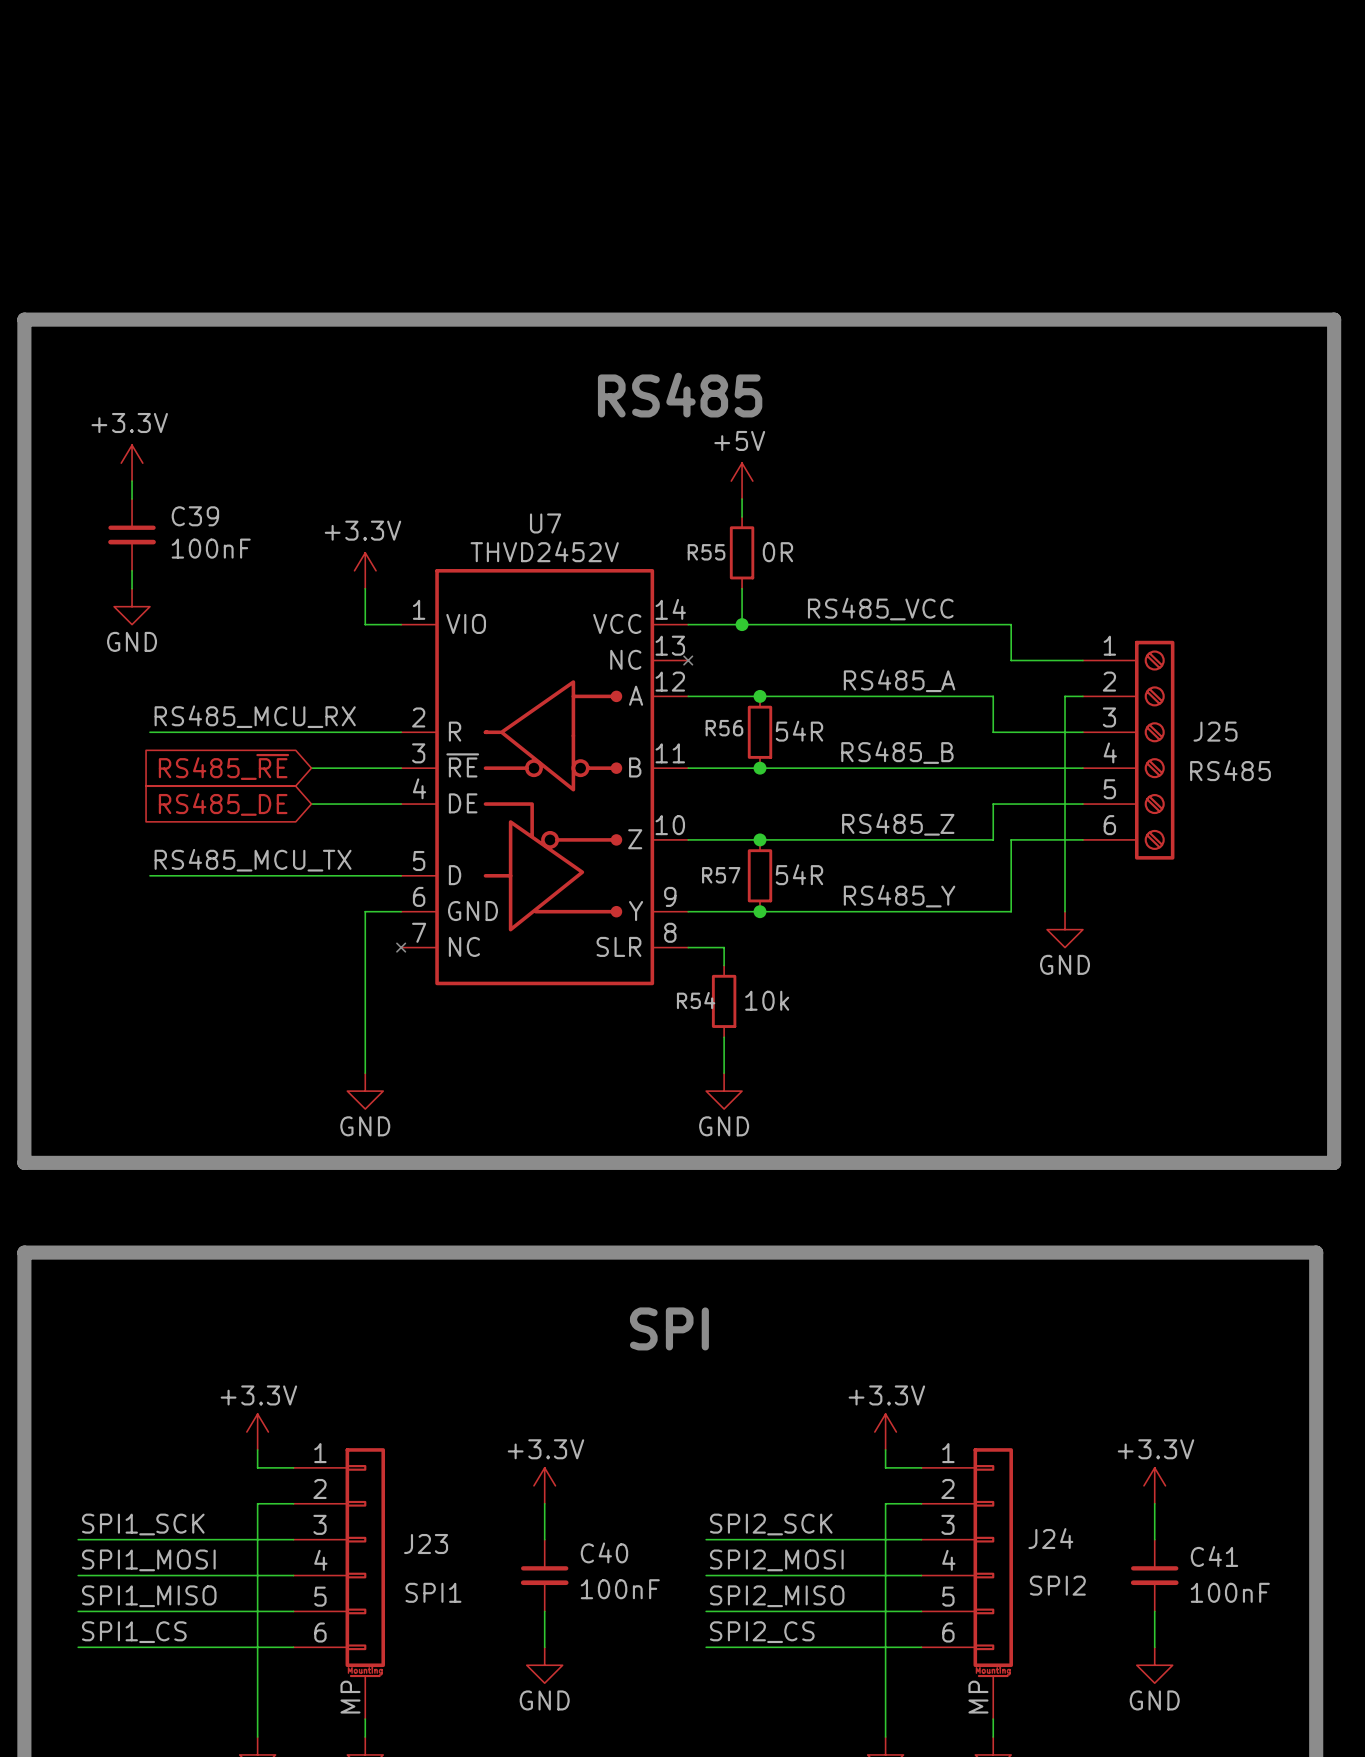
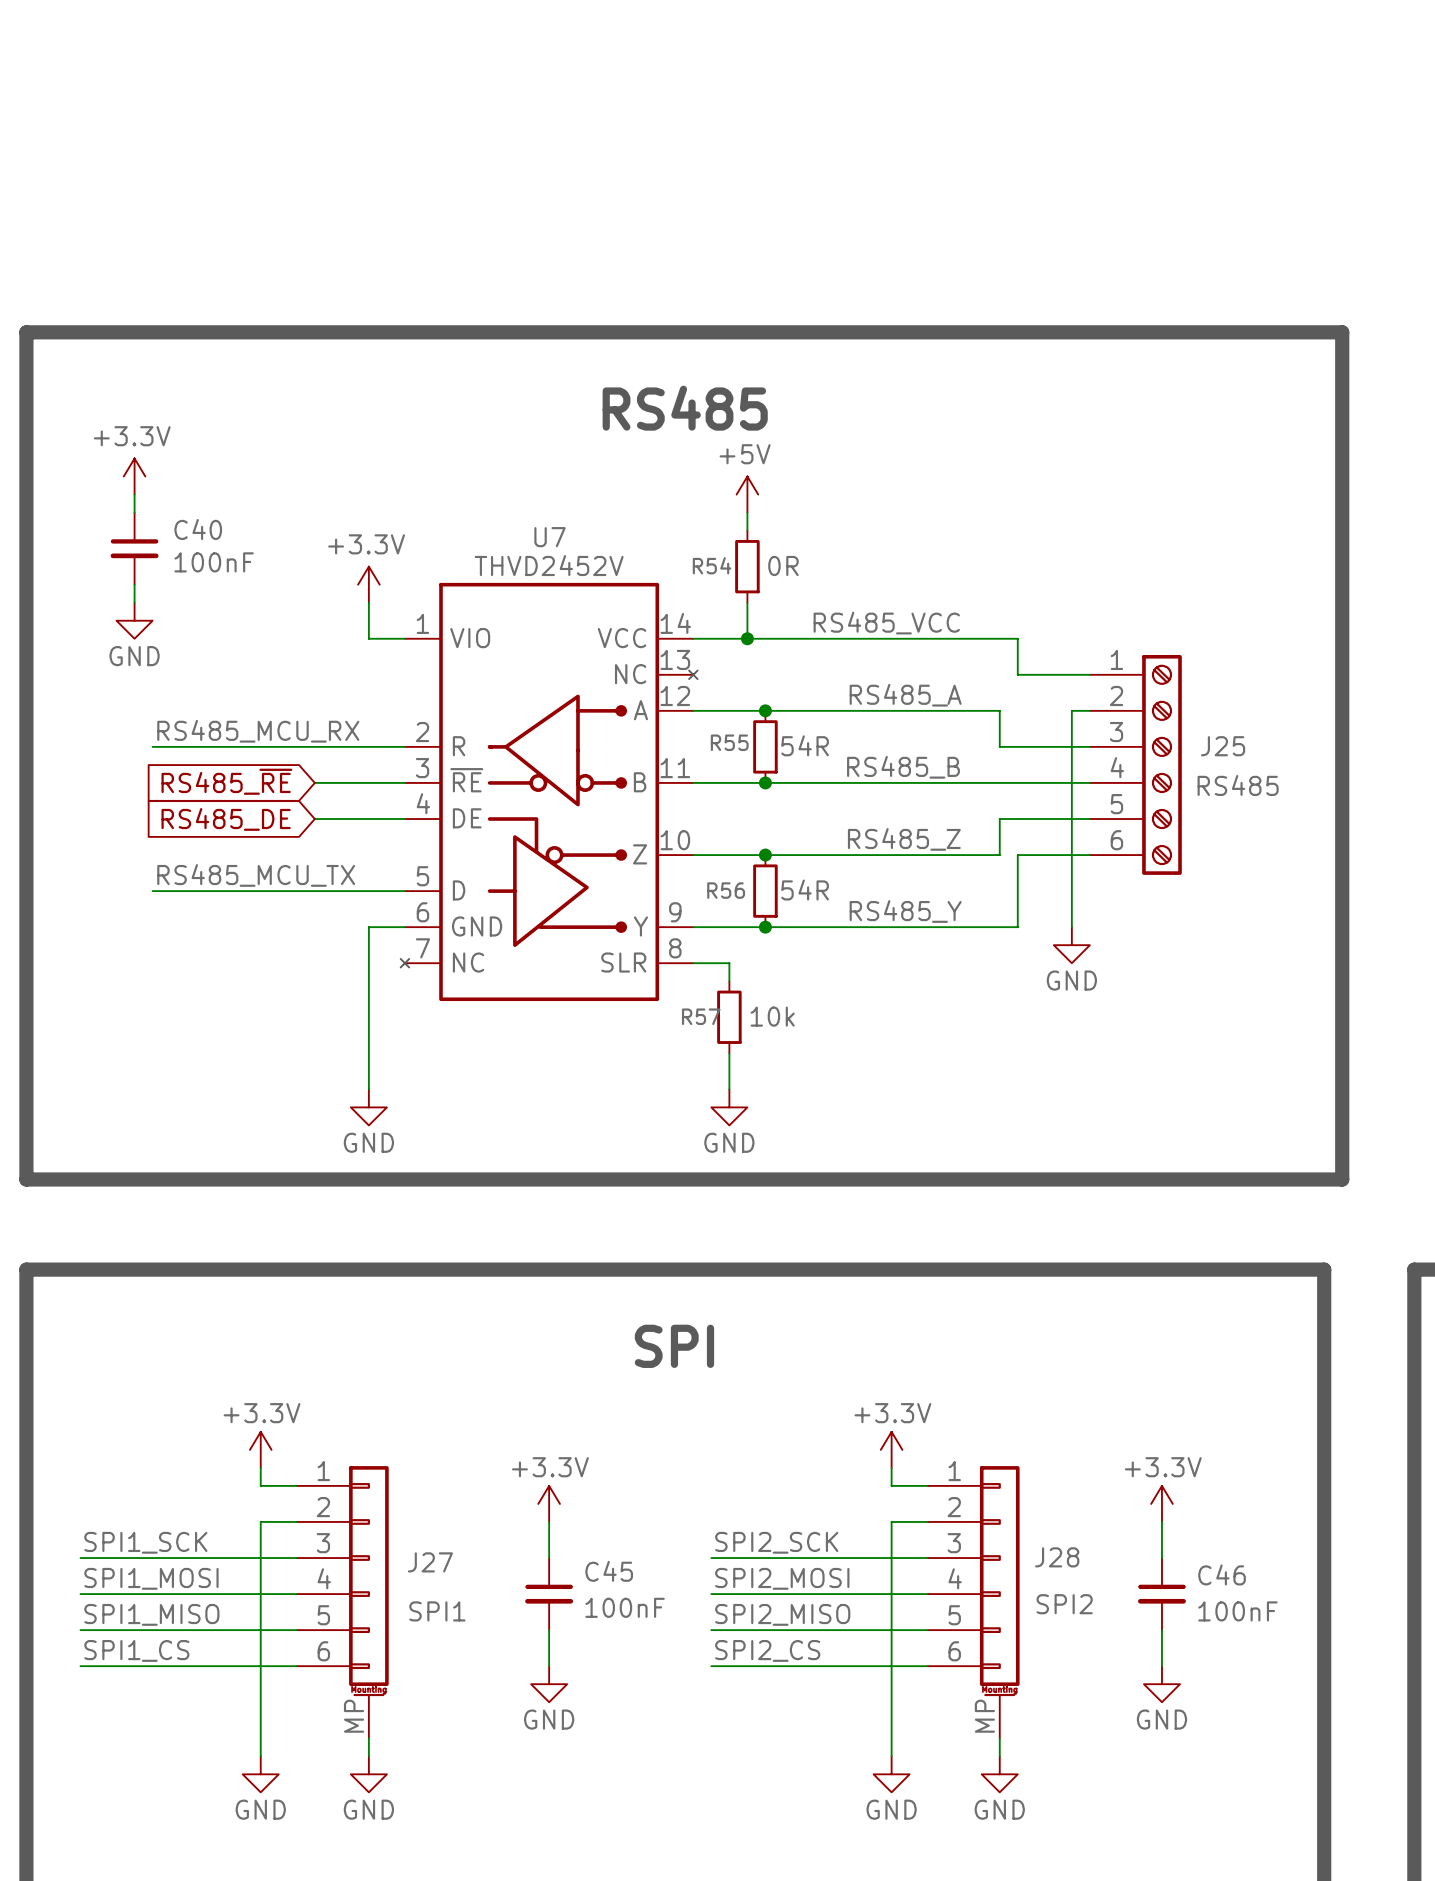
C39 name: C39 (195, 516) -> C40 (198, 529)
R55 name: R55 (706, 552) -> R54 (712, 565)
R56 name: R56 (724, 728) -> R55 (729, 742)
R57 name: R57 (721, 875) -> R56 (726, 890)
R54 name: R54 (696, 1000) -> R57 (701, 1016)
J24 name: J24 (1050, 1538) -> J28 (1057, 1557)
J23 name: J23 (426, 1544) -> J27 (430, 1562)
C40 name: C40 (604, 1552) -> C45 (609, 1571)
C41 name: C41 (1214, 1556) -> C46 (1222, 1574)

